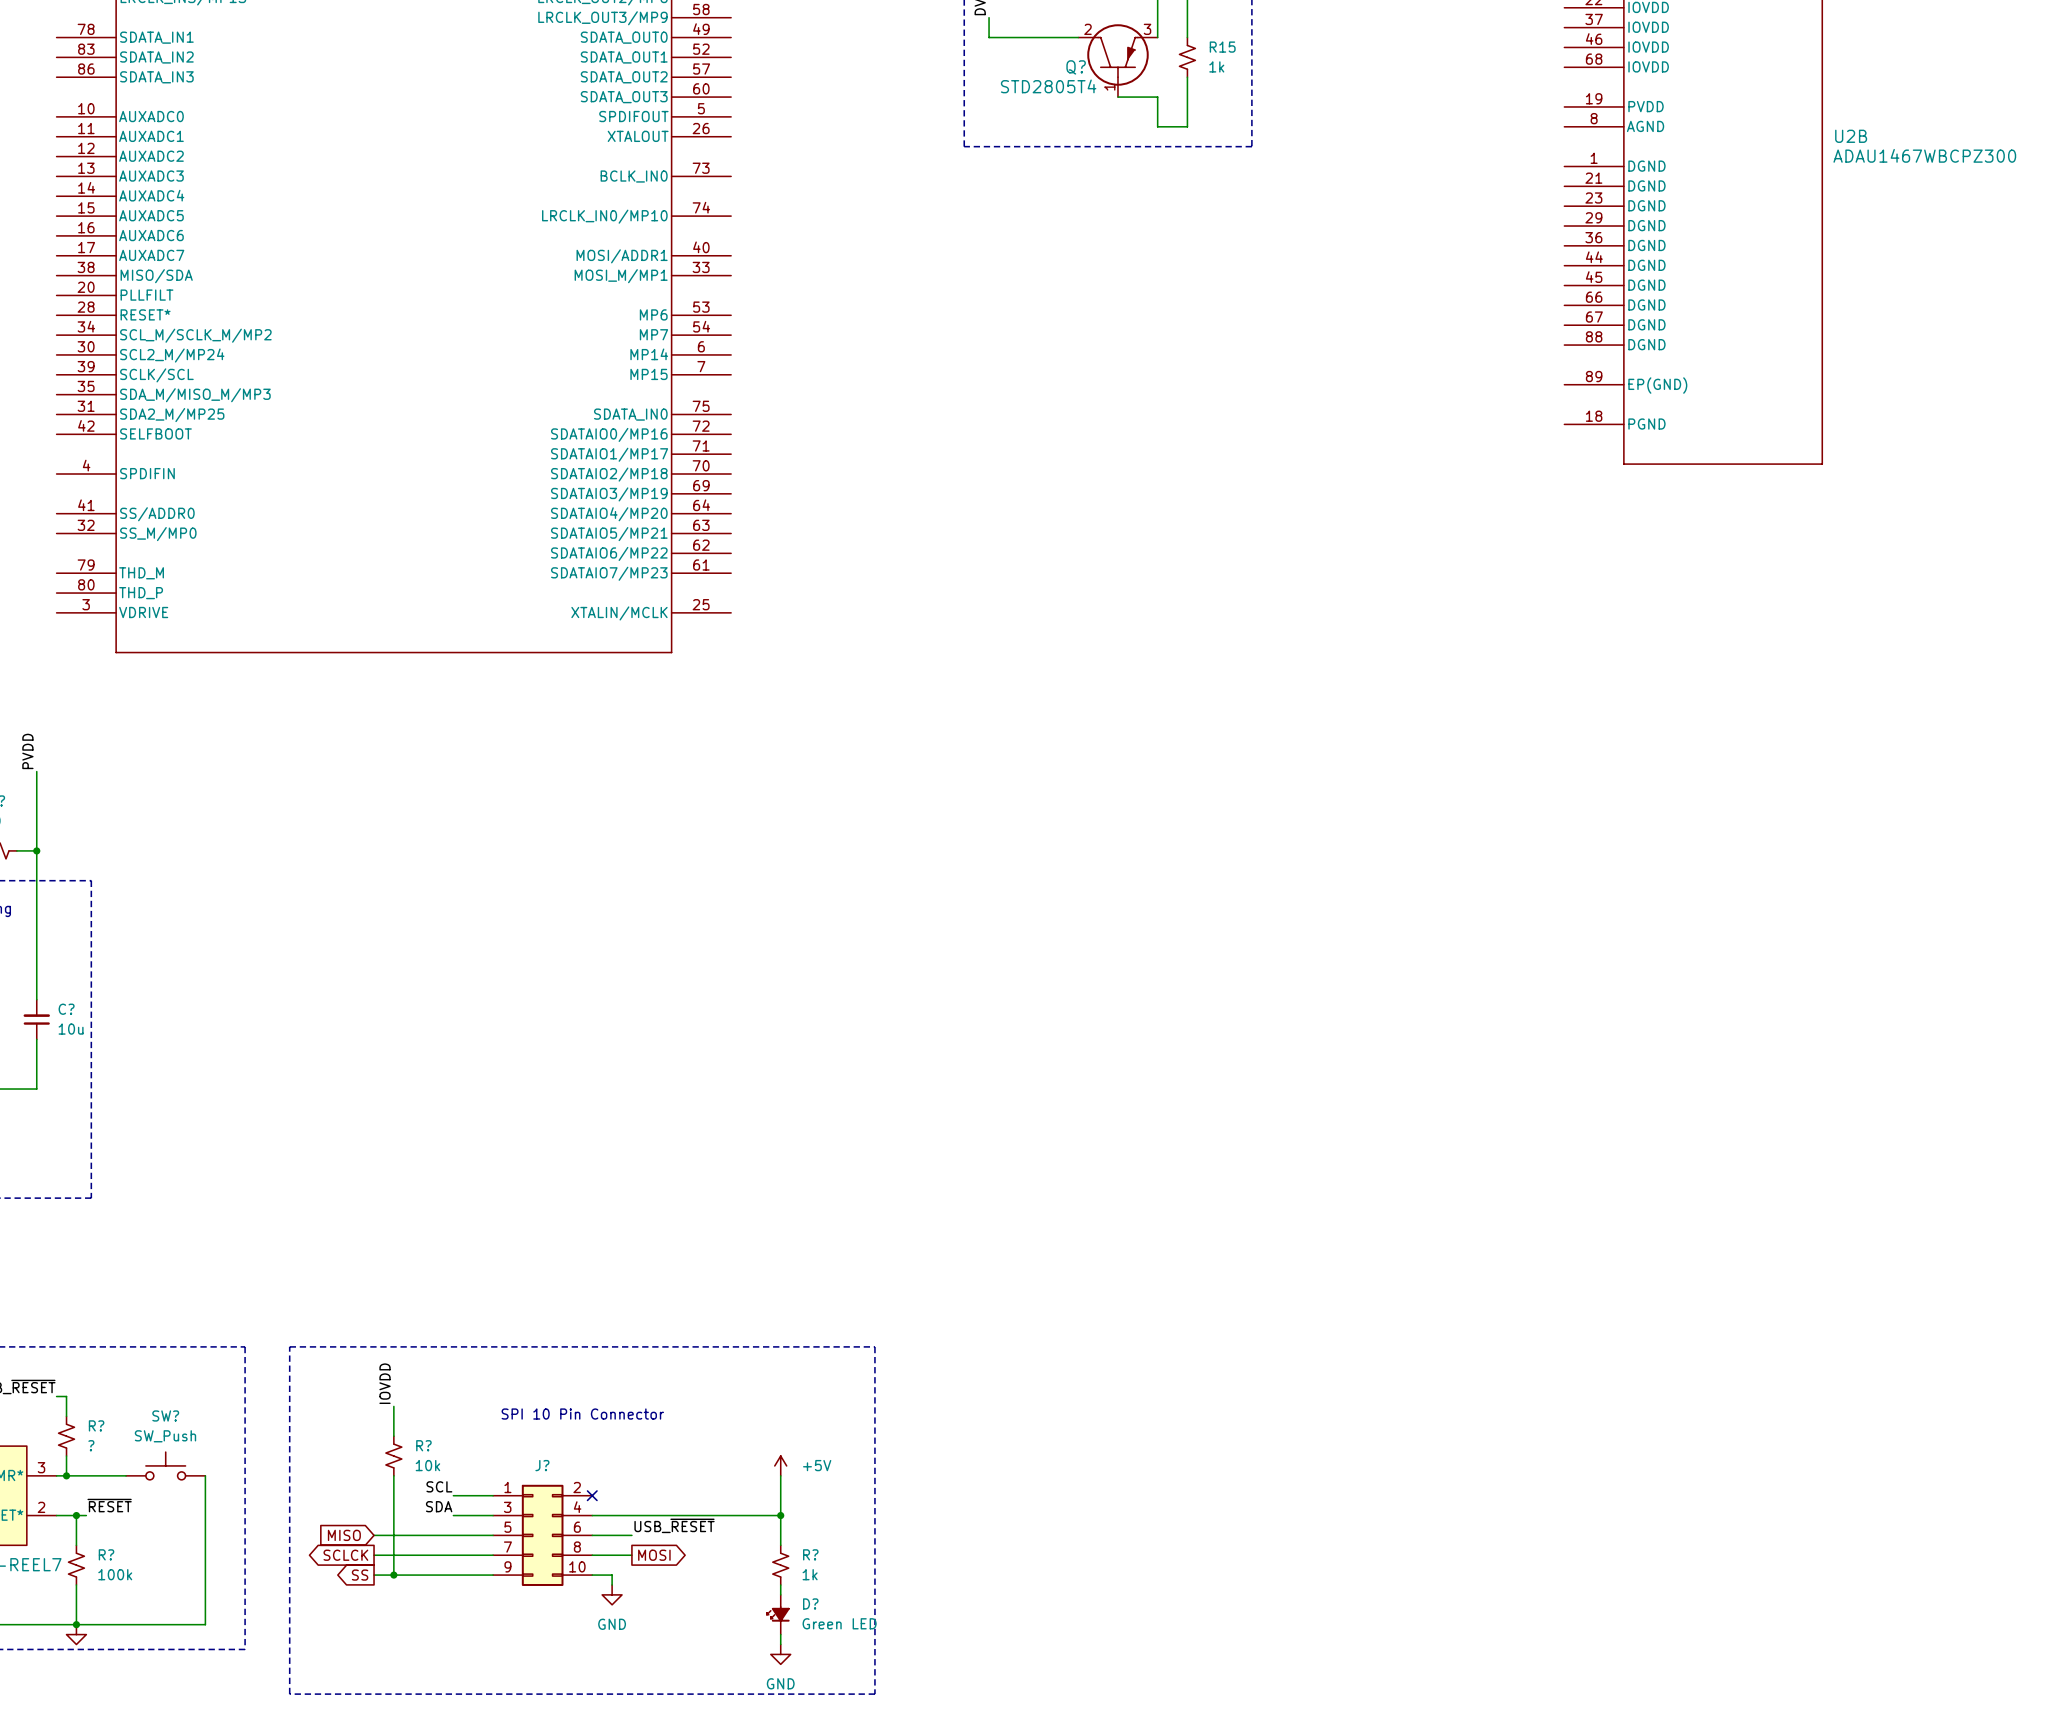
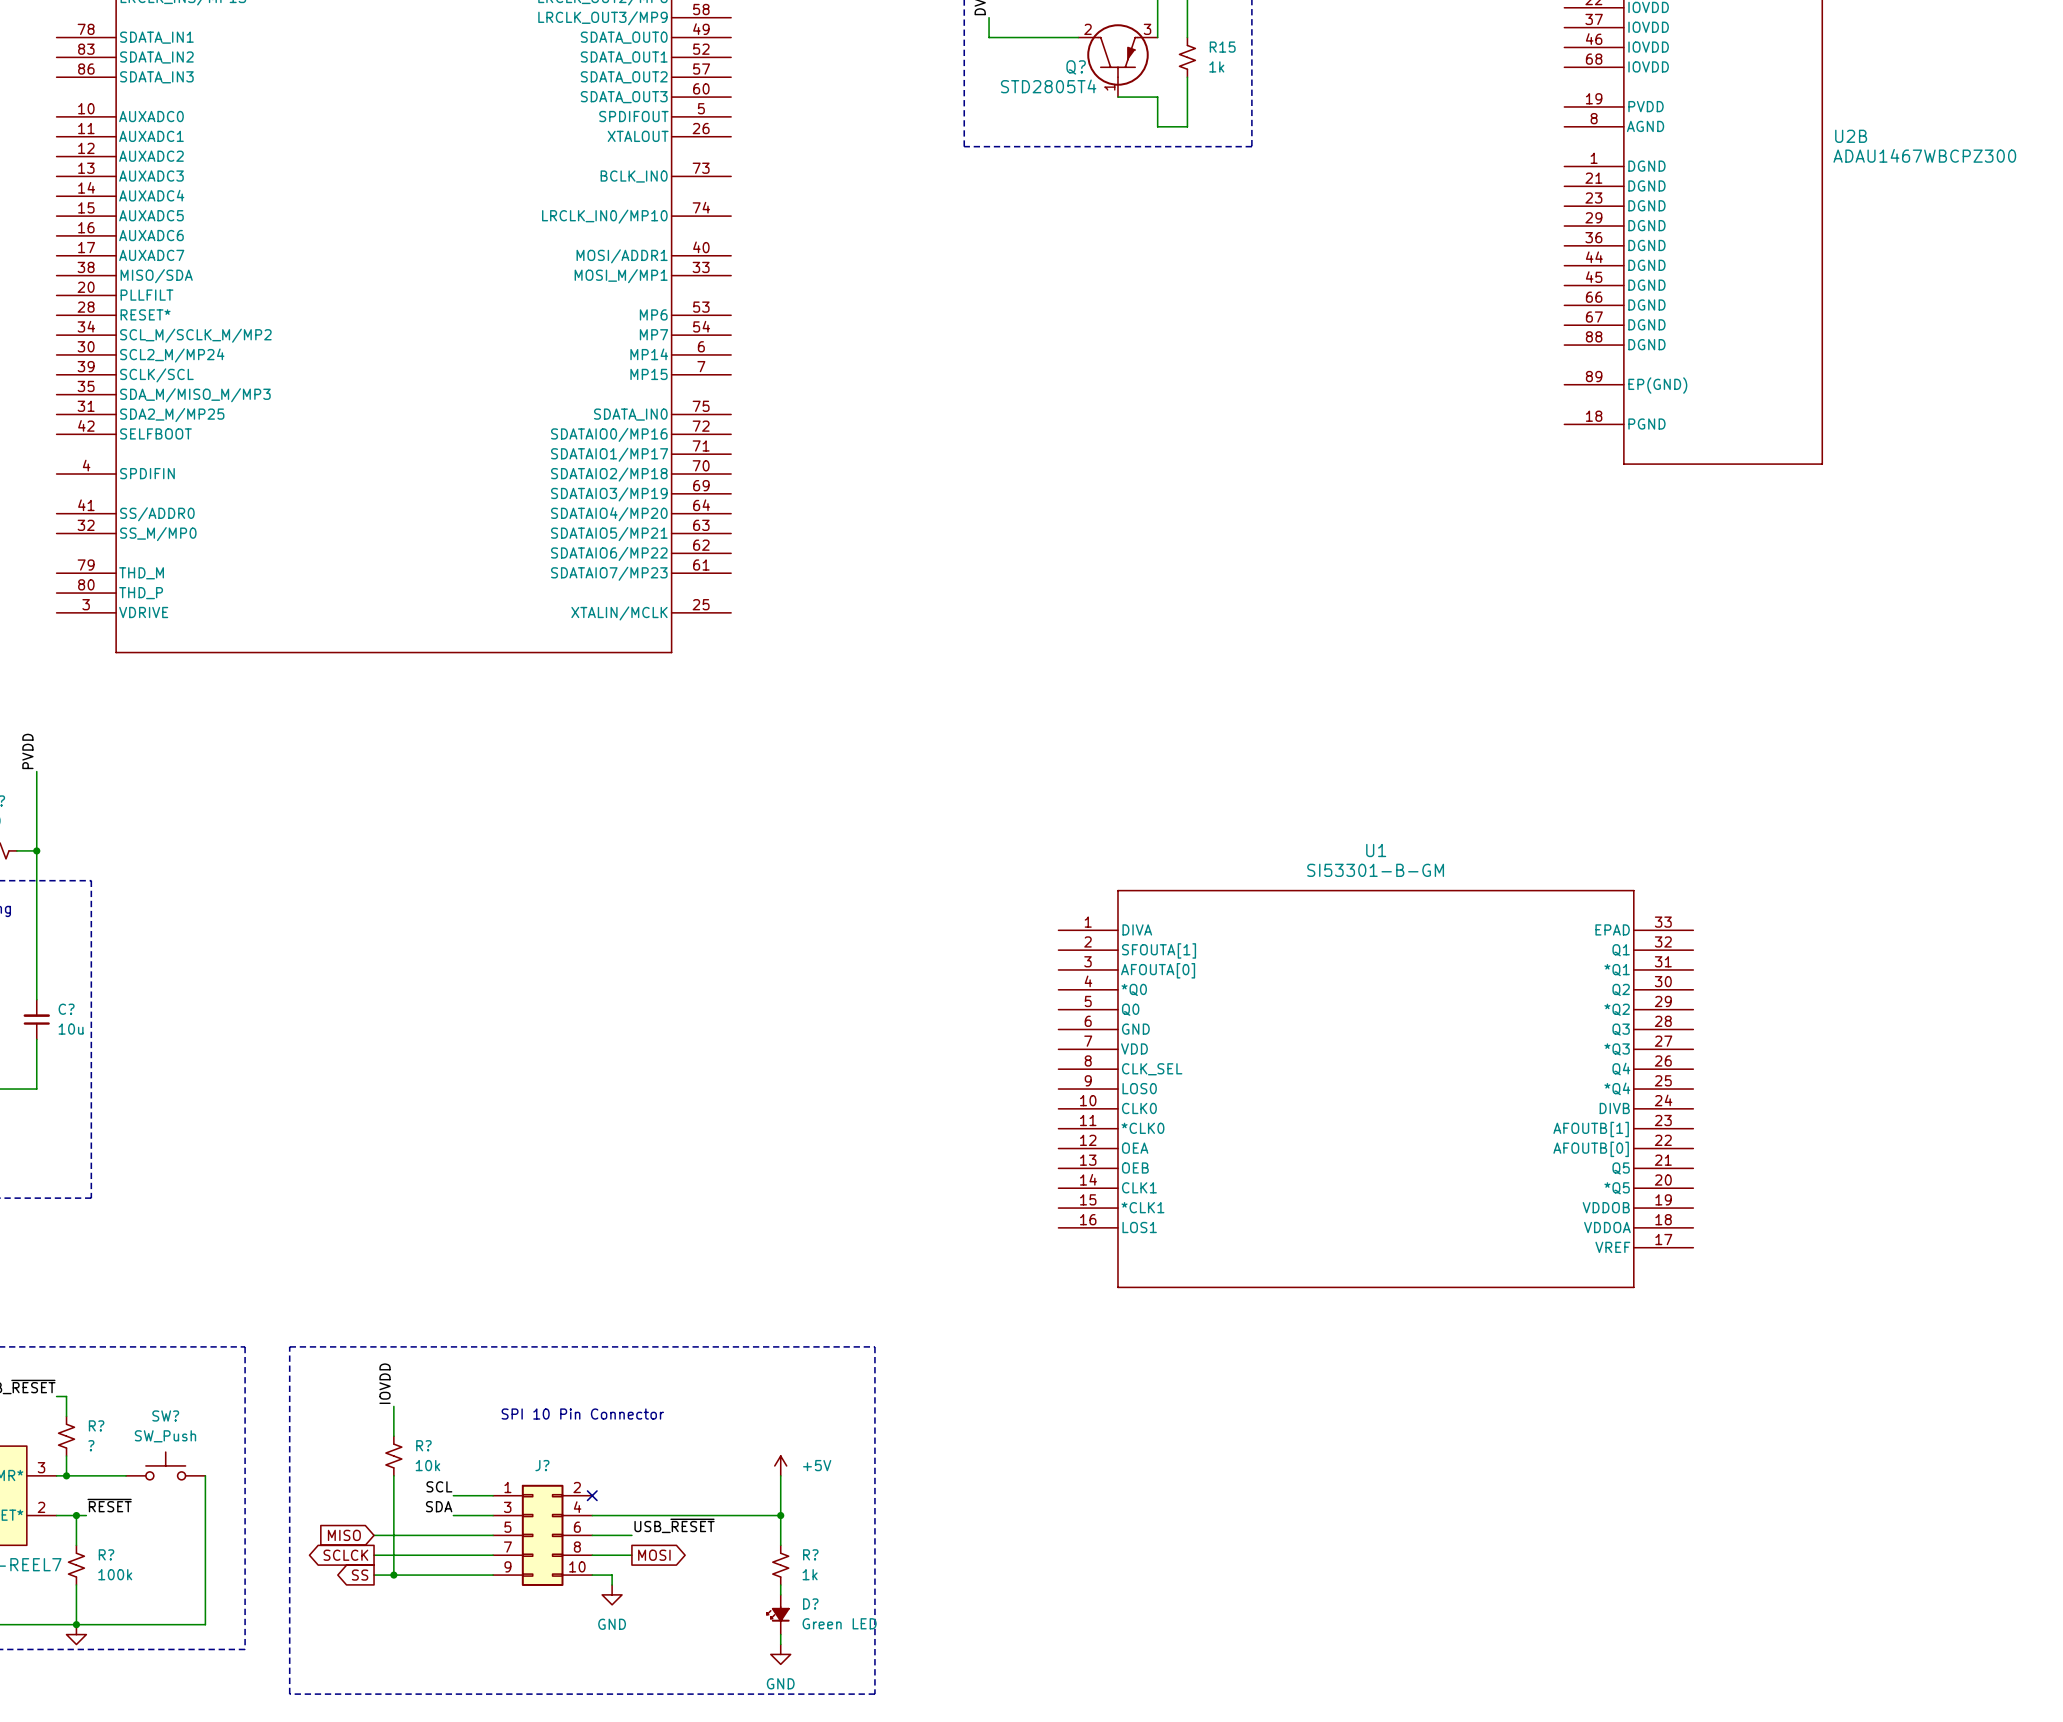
U1: none -> SI53301-B-GM (1375, 1089)

